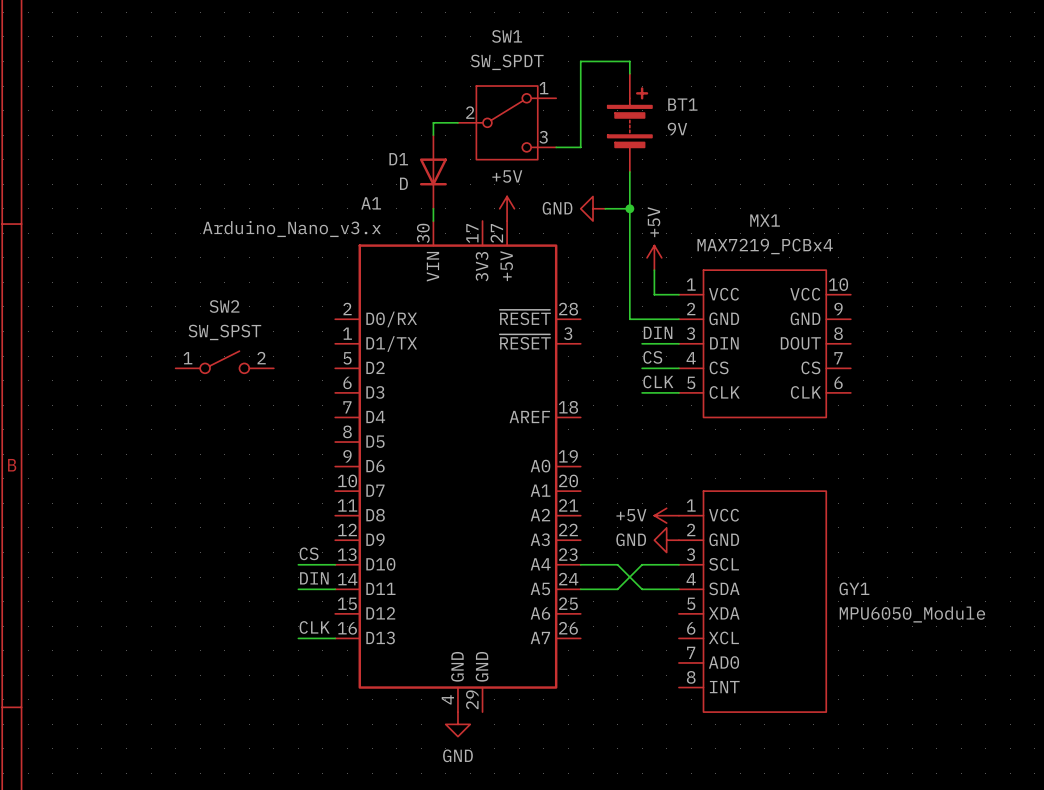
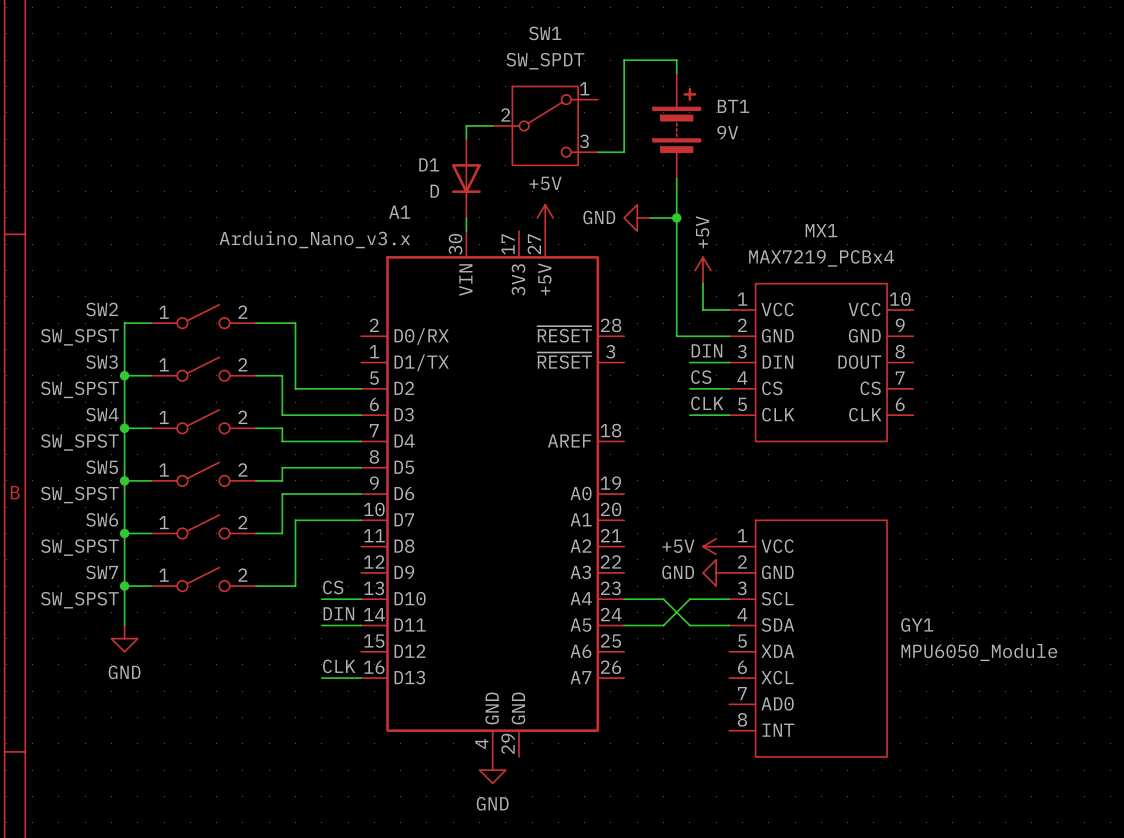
wire: none -> (150, 323) (124, 323) (124, 625)
SW2 name position: SW2 (224, 306) -> SW2 (102, 309)
wire: none -> (256, 323) (295, 323) (295, 388) (361, 388)
SW2 value position: SW_SPST (224, 332) -> SW_SPST (79, 337)
SW3: none -> SW_SPST (203, 369)
wire: none -> (124, 375) (150, 375)
junction: none -> (124, 375)
wire: none -> (256, 375) (282, 375) (282, 415) (361, 415)
SW2 position: (224, 362) -> (203, 316)
SW4: none -> SW_SPST (203, 421)
wire: none -> (124, 428) (150, 428)
junction: none -> (124, 428)
wire: none -> (256, 428) (282, 428) (282, 441) (361, 441)
wire: none -> (361, 467) (282, 467) (282, 480) (256, 480)
SW5: none -> SW_SPST (203, 474)
wire: none -> (124, 480) (150, 480)
junction: none -> (124, 480)
wire: none -> (361, 494) (282, 494) (282, 533) (256, 533)
wire: none -> (361, 520) (295, 520) (295, 586) (256, 586)
SW6: none -> SW_SPST (203, 526)
wire: none -> (124, 533) (150, 533)
junction: none -> (124, 533)
SW7: none -> SW_SPST (203, 579)
wire: none -> (124, 586) (150, 586)
junction: none -> (124, 586)
power symbol: none -> GND (124, 638)

